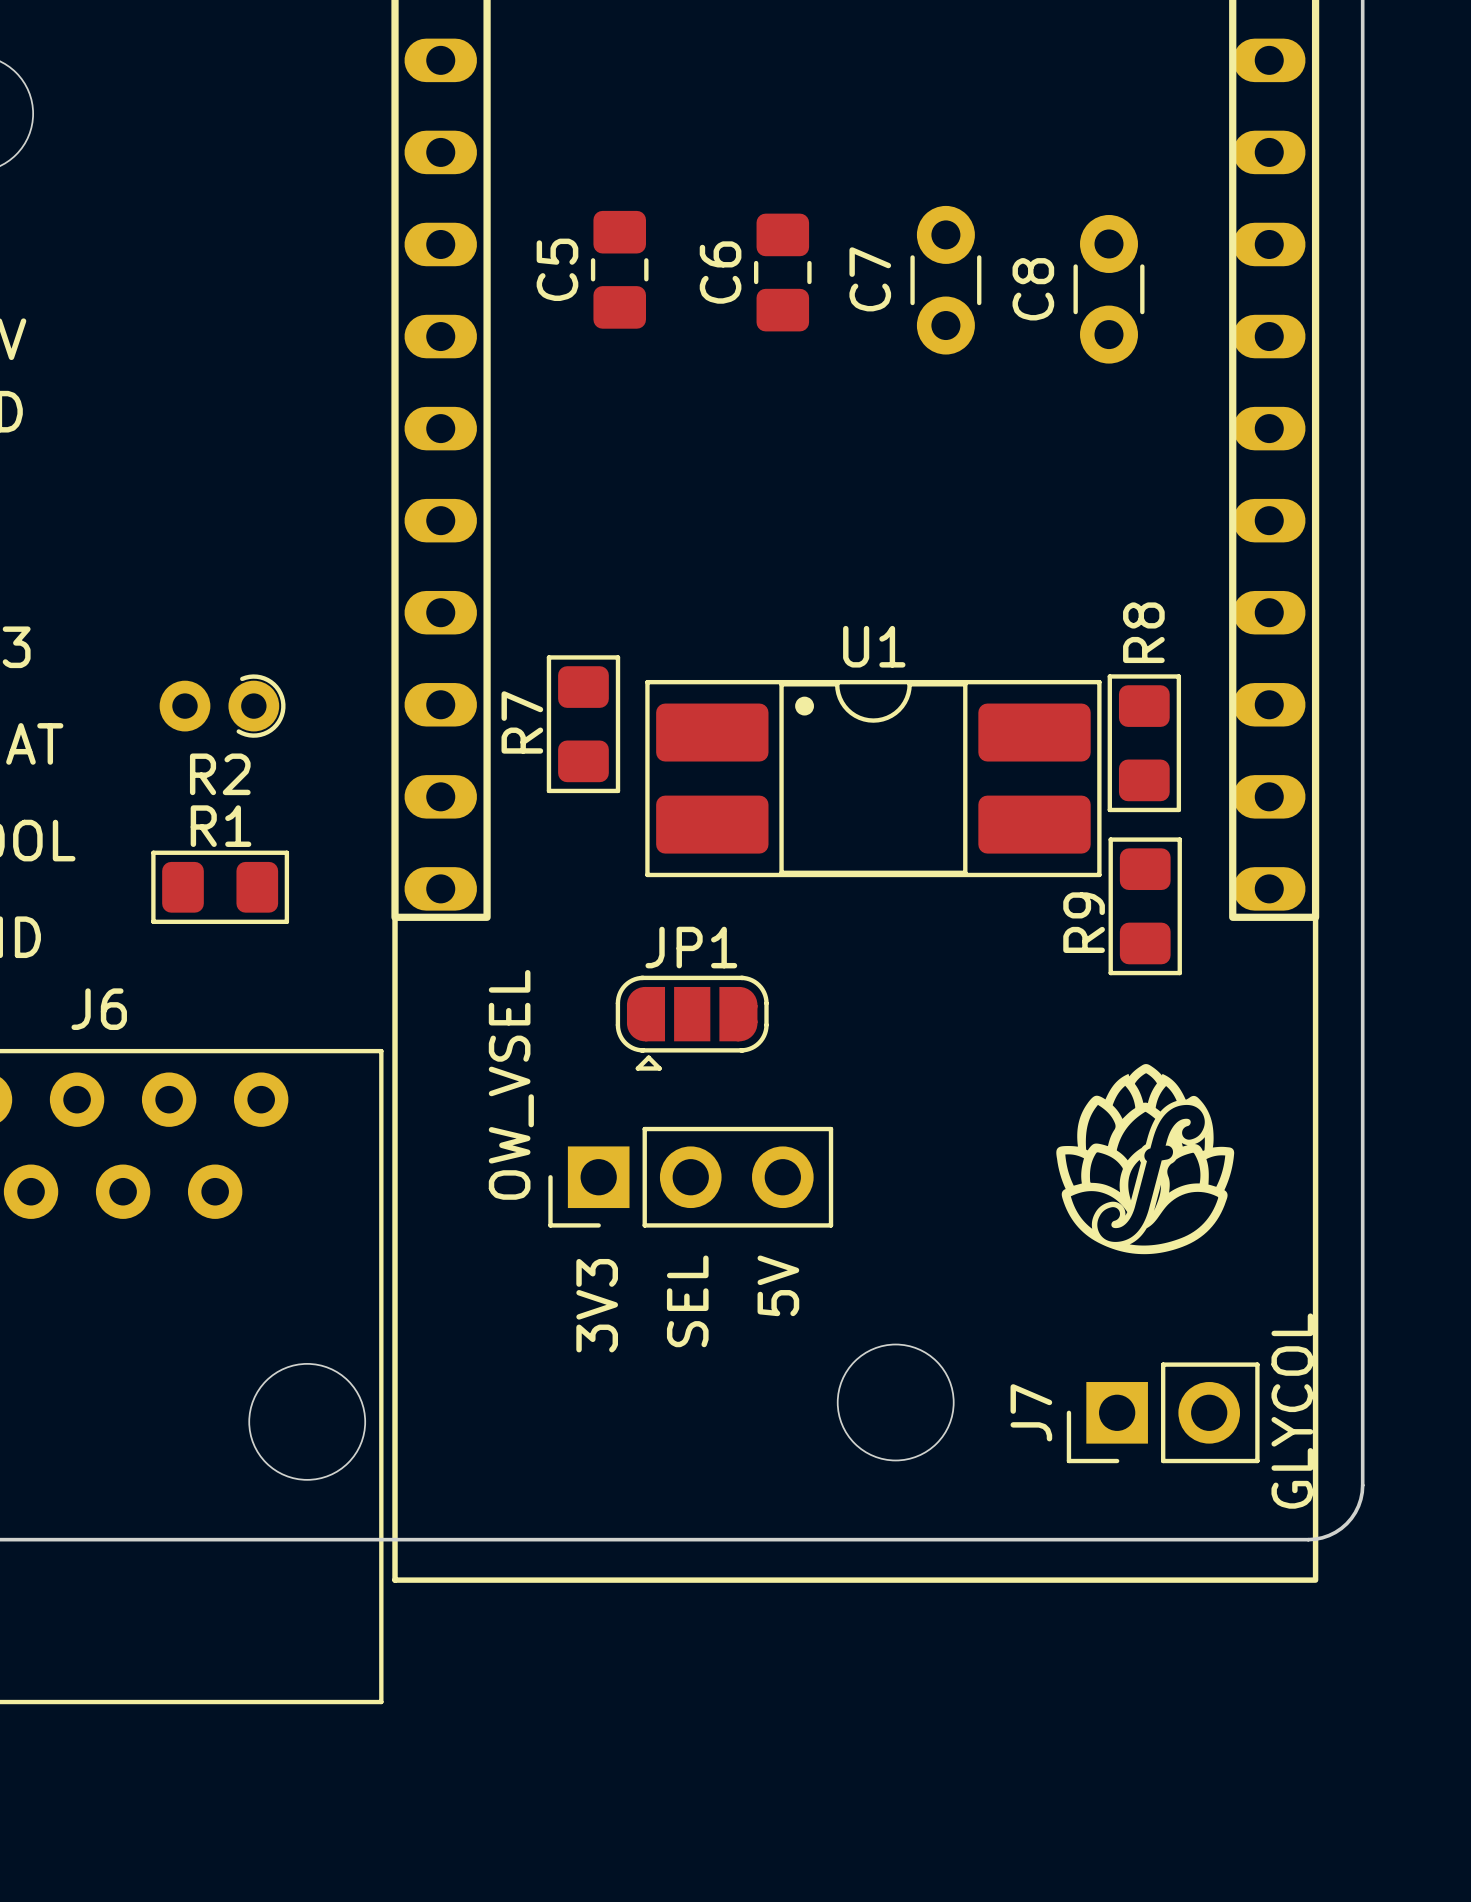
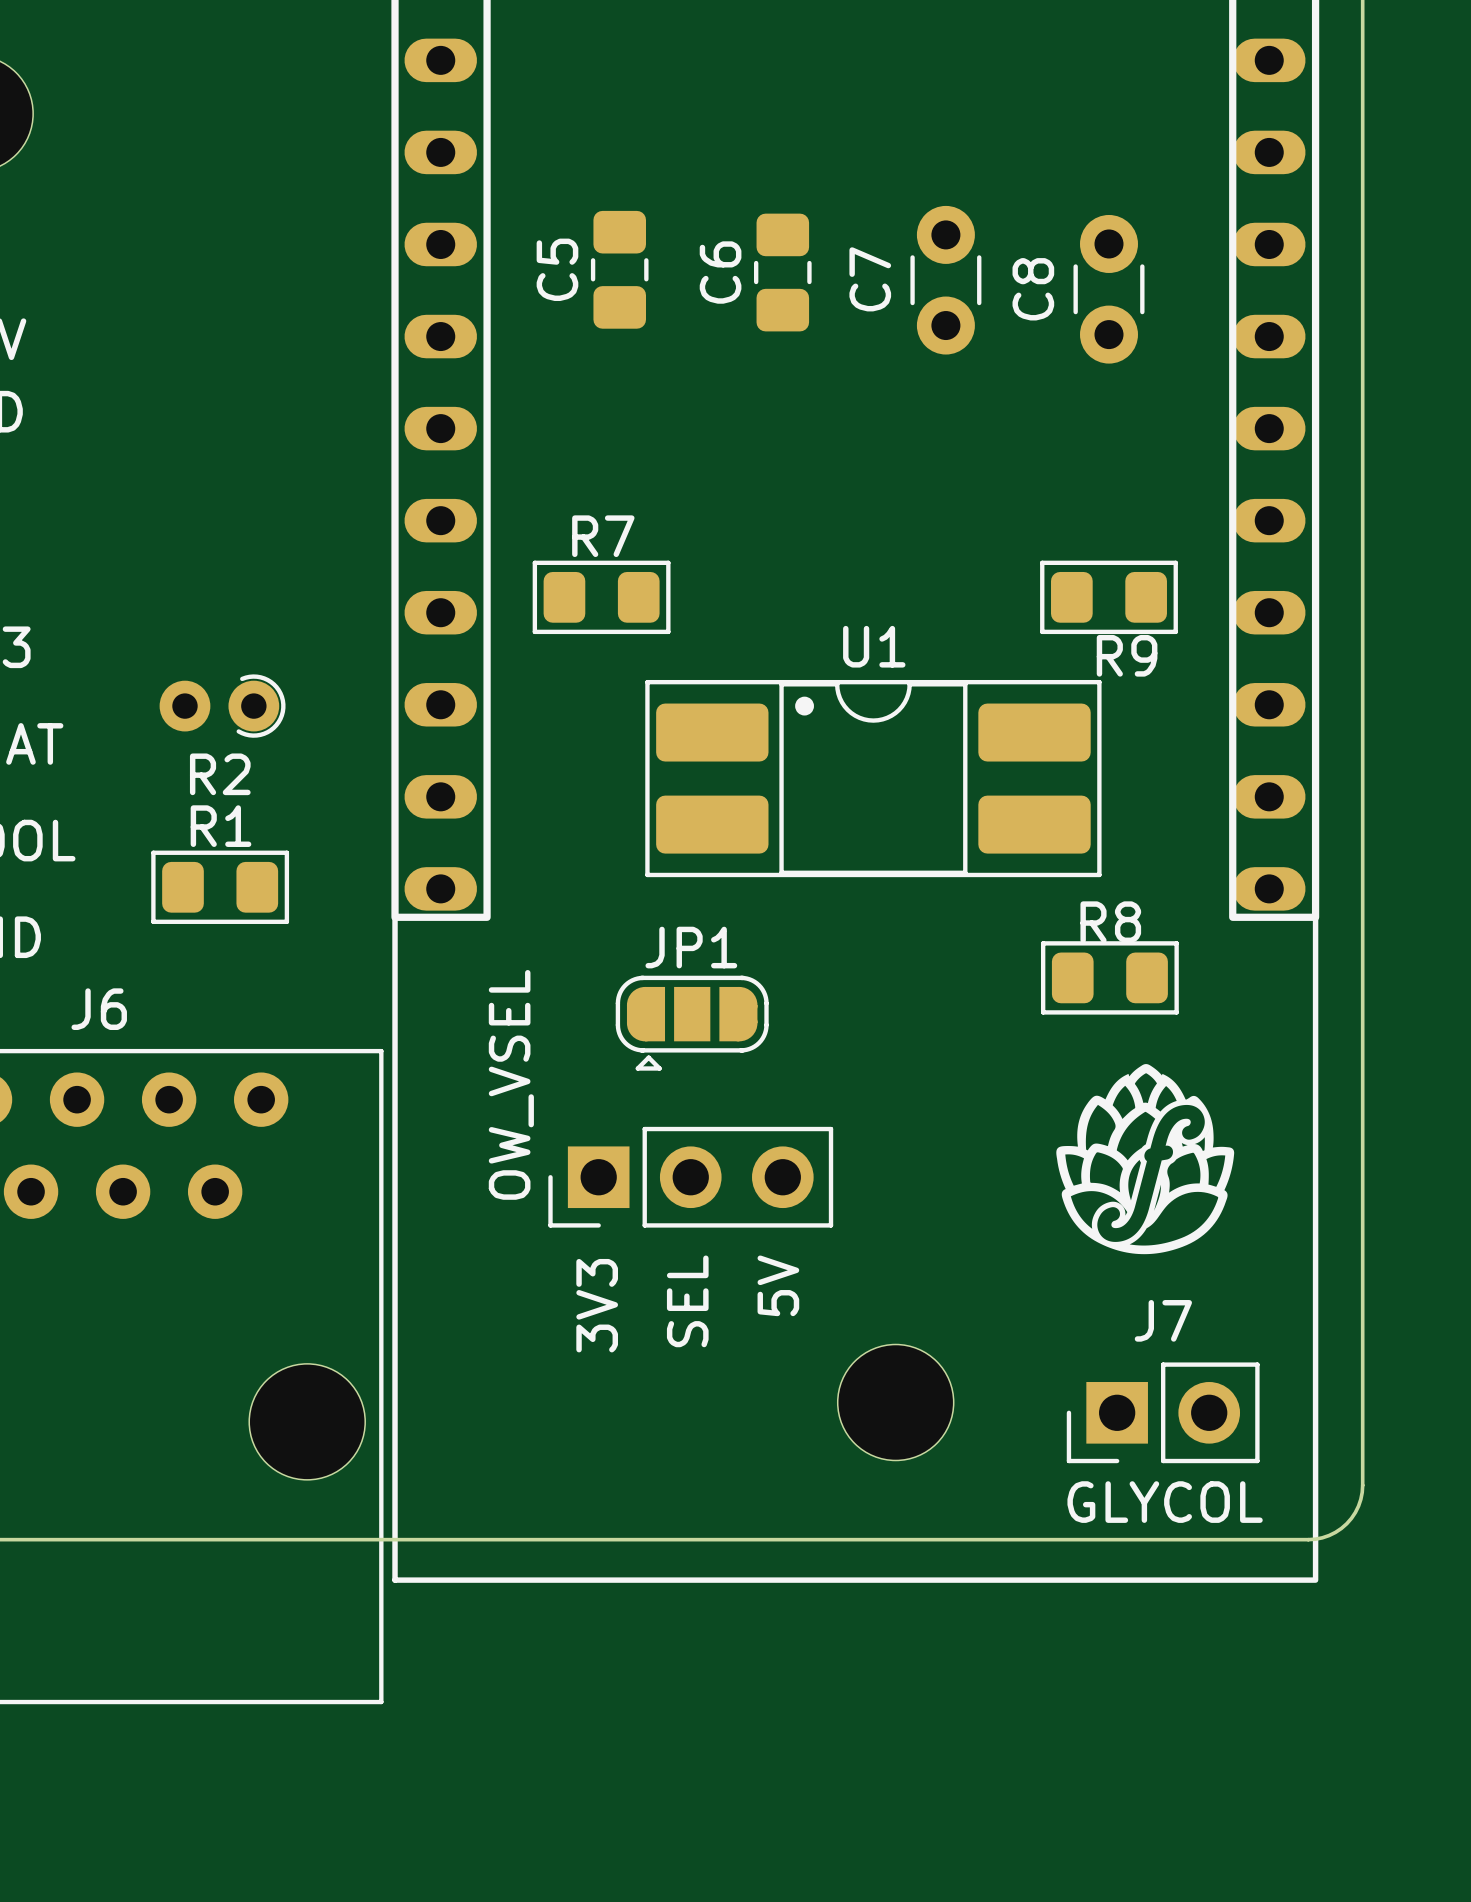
R7 rotation: 0° (583, 724) -> 90° clockwise (601, 597)
R7 position: (583, 724) -> (601, 597)
R8 rotation: 0° (1144, 743) -> 90° clockwise (1109, 977)
R8 position: (1144, 743) -> (1109, 977)
R9 rotation: 0° (1145, 906) -> 90° clockwise (1108, 597)
R9 position: (1145, 906) -> (1108, 597)
R9 name position: R9 (1084, 922) -> R9 (1127, 655)
J7 value rotation: 0° (1292, 1411) -> 90° clockwise (1165, 1502)
J7 name rotation: 0° (1031, 1412) -> 90° clockwise (1163, 1320)
J7 name position: J7 (1031, 1412) -> J7 (1163, 1320)

